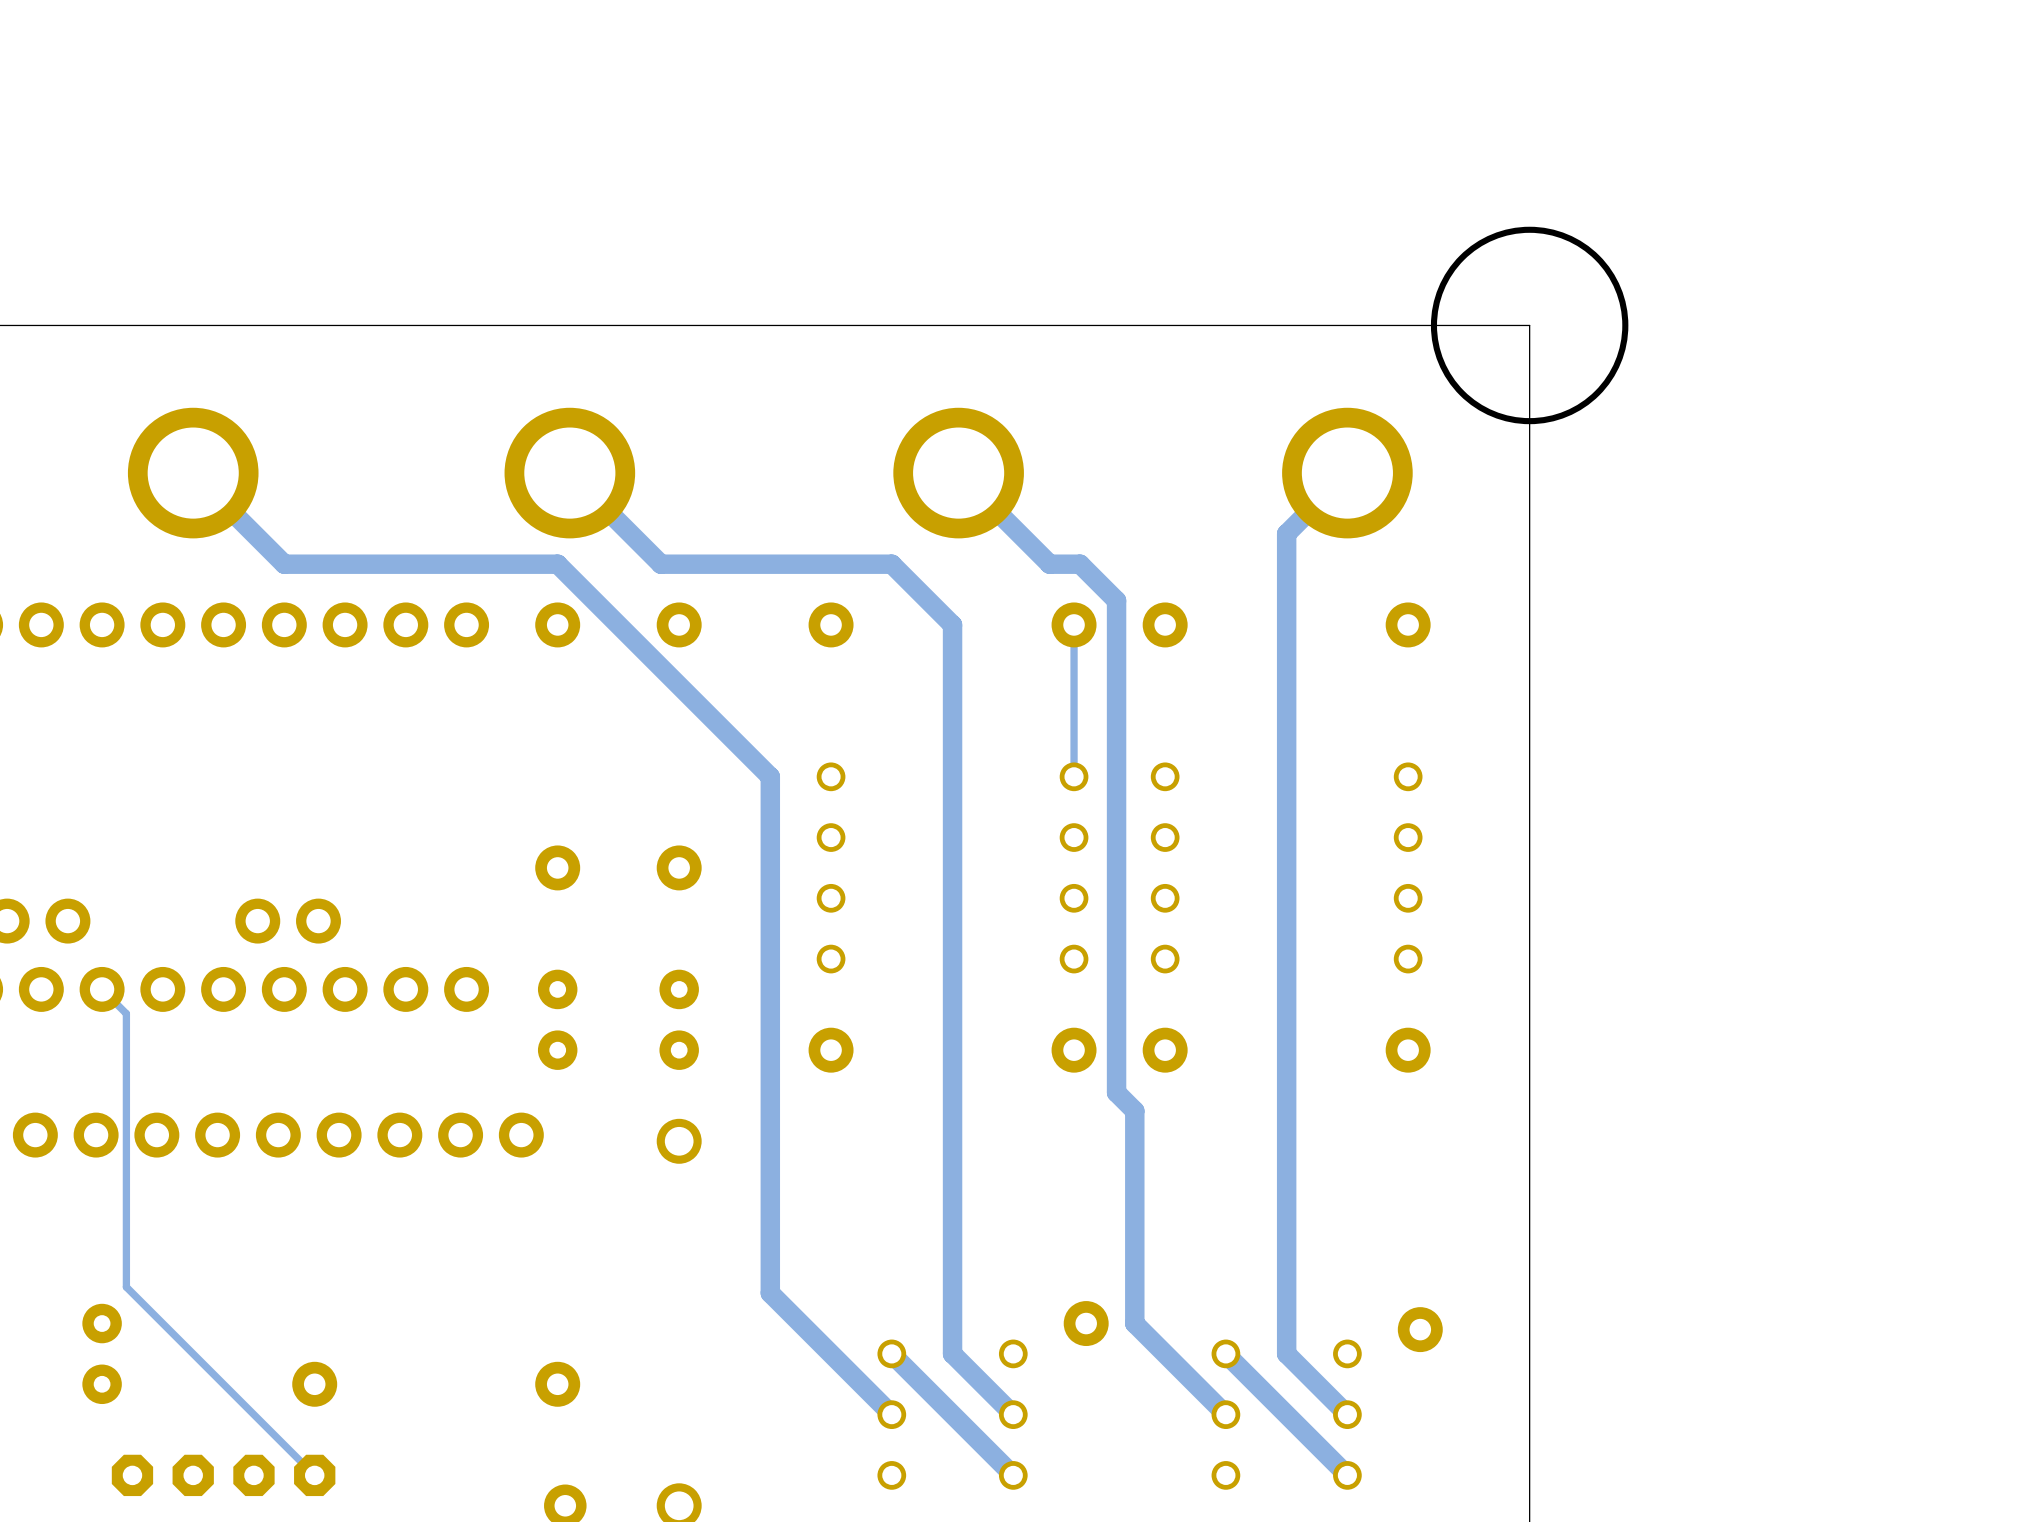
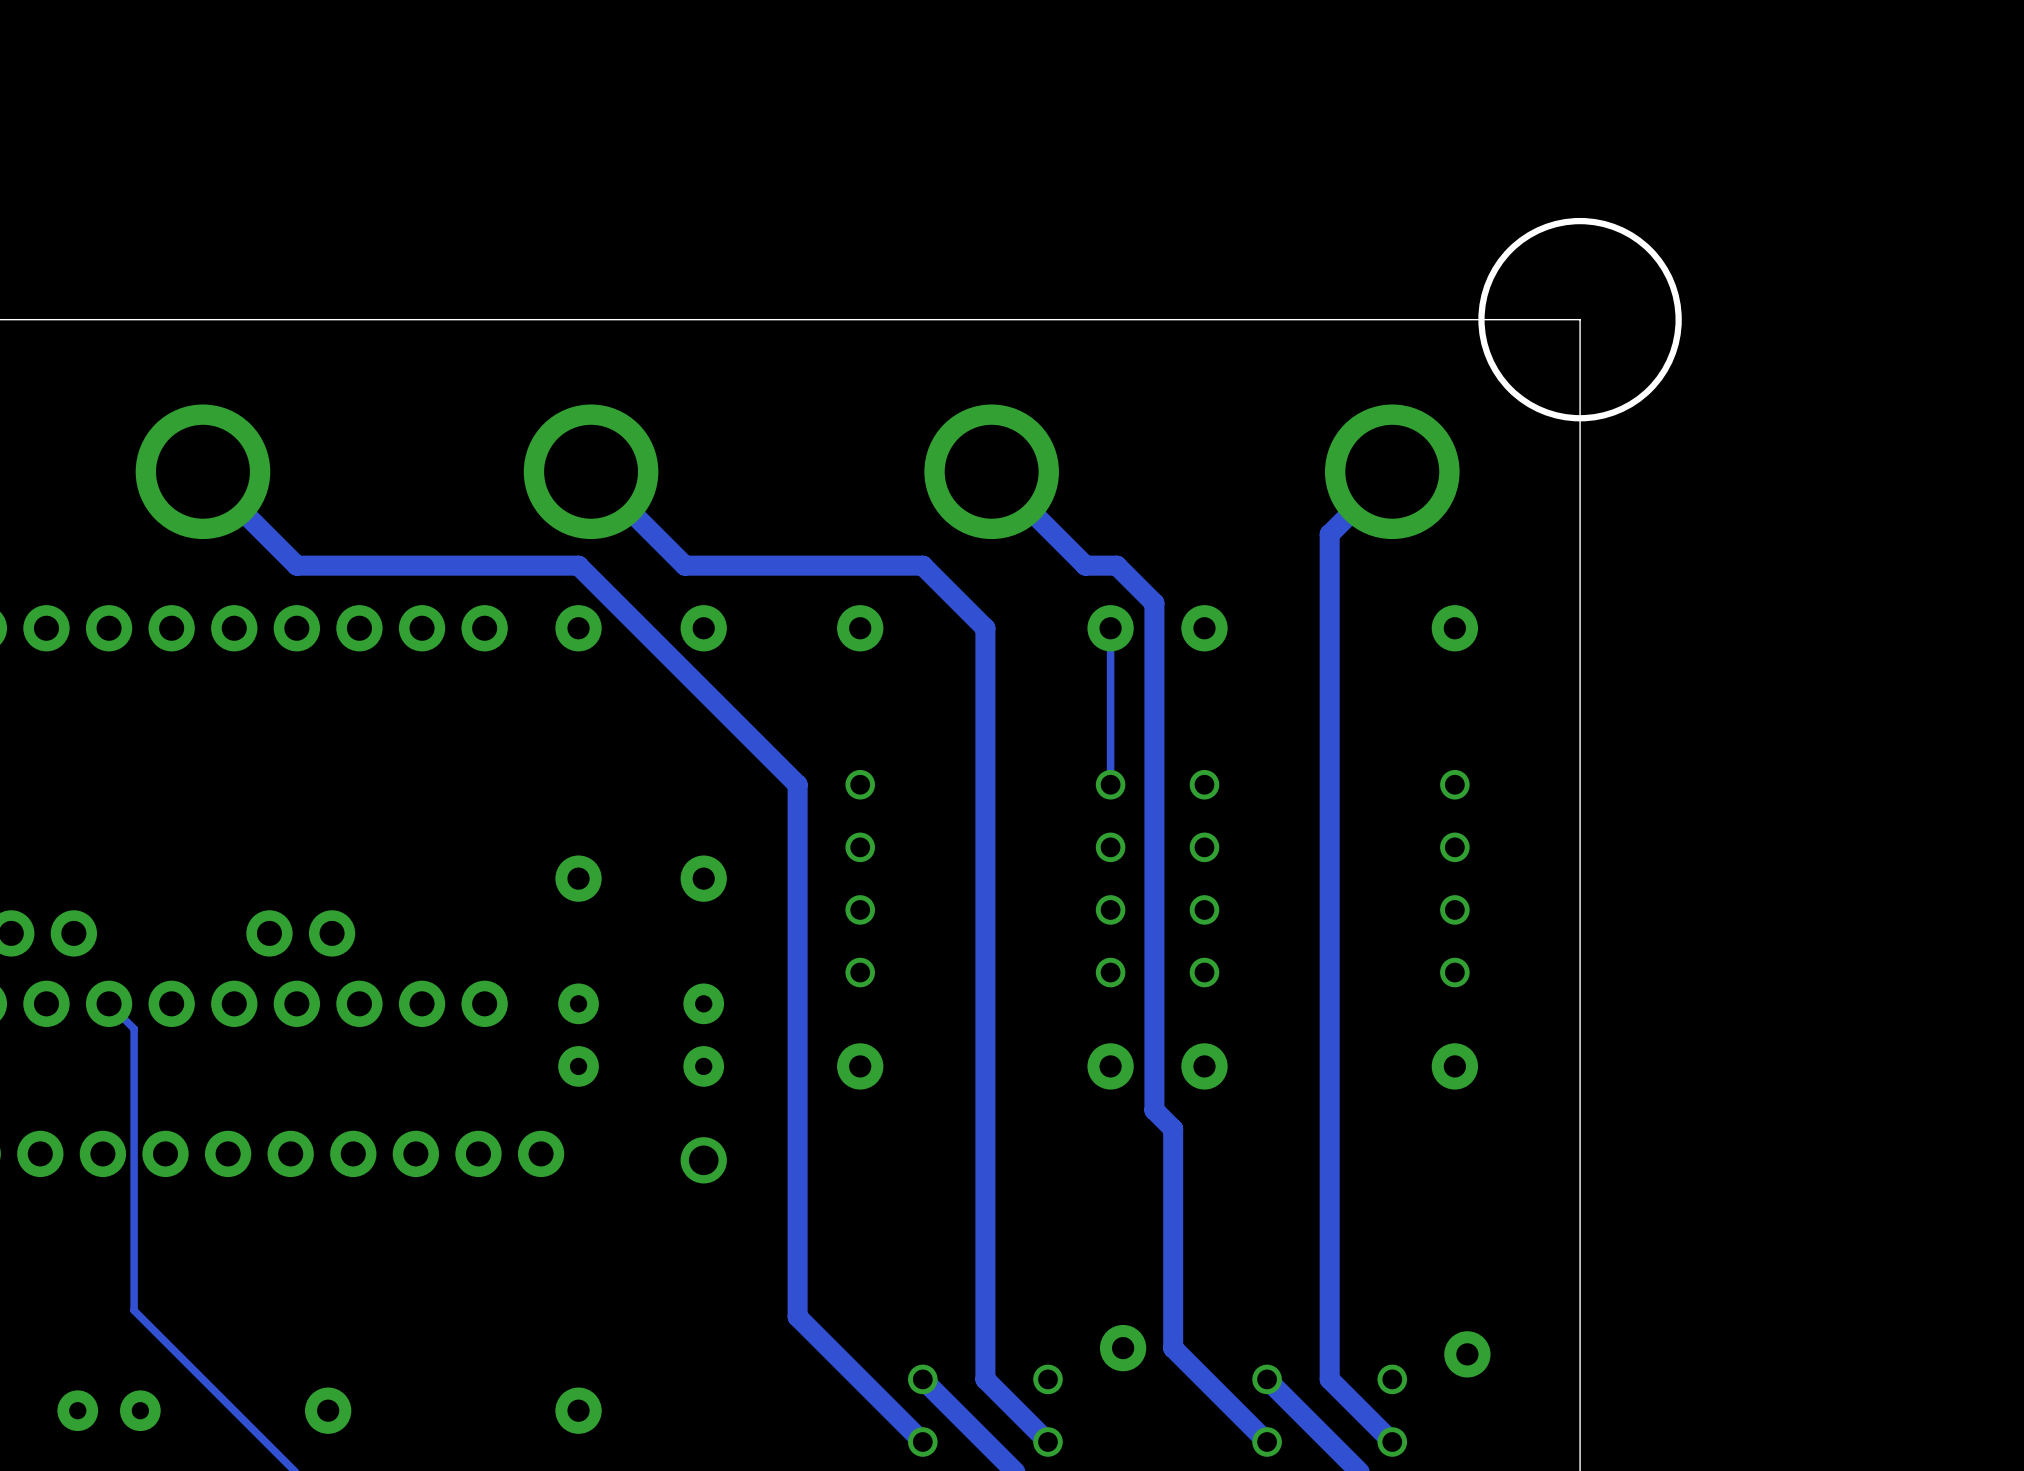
part rotation: 0° (102, 1353) -> 90° clockwise (109, 1410)

